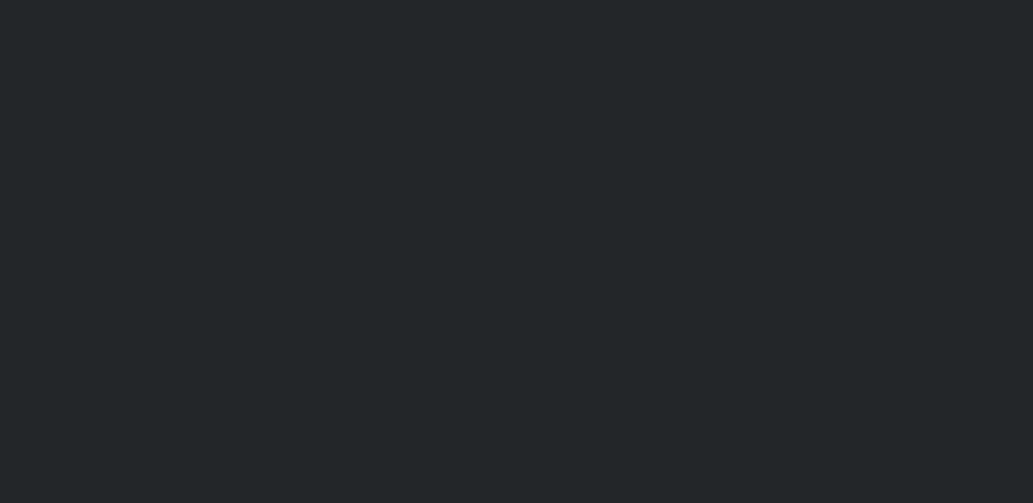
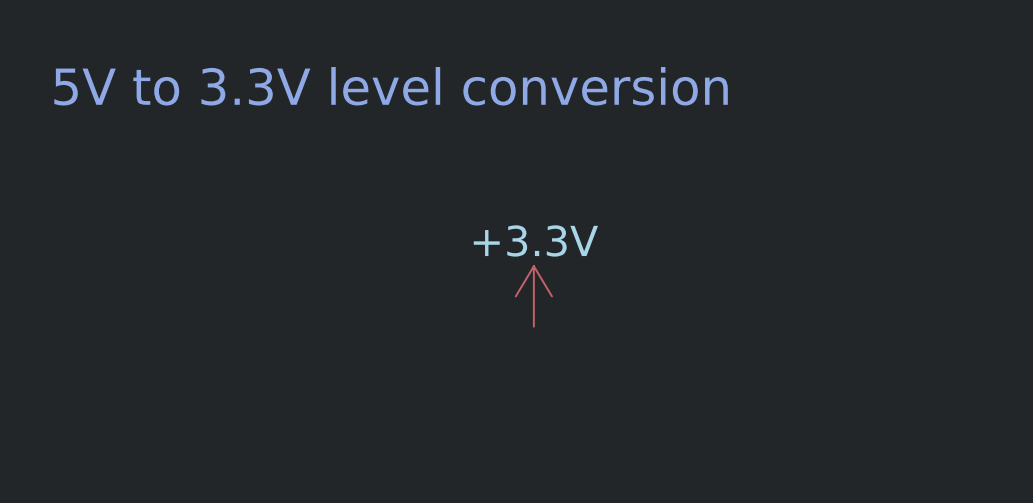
text: none -> 5V to 3.3V level conversion (391, 86)
power symbol: none -> +3.3V (533, 296)

